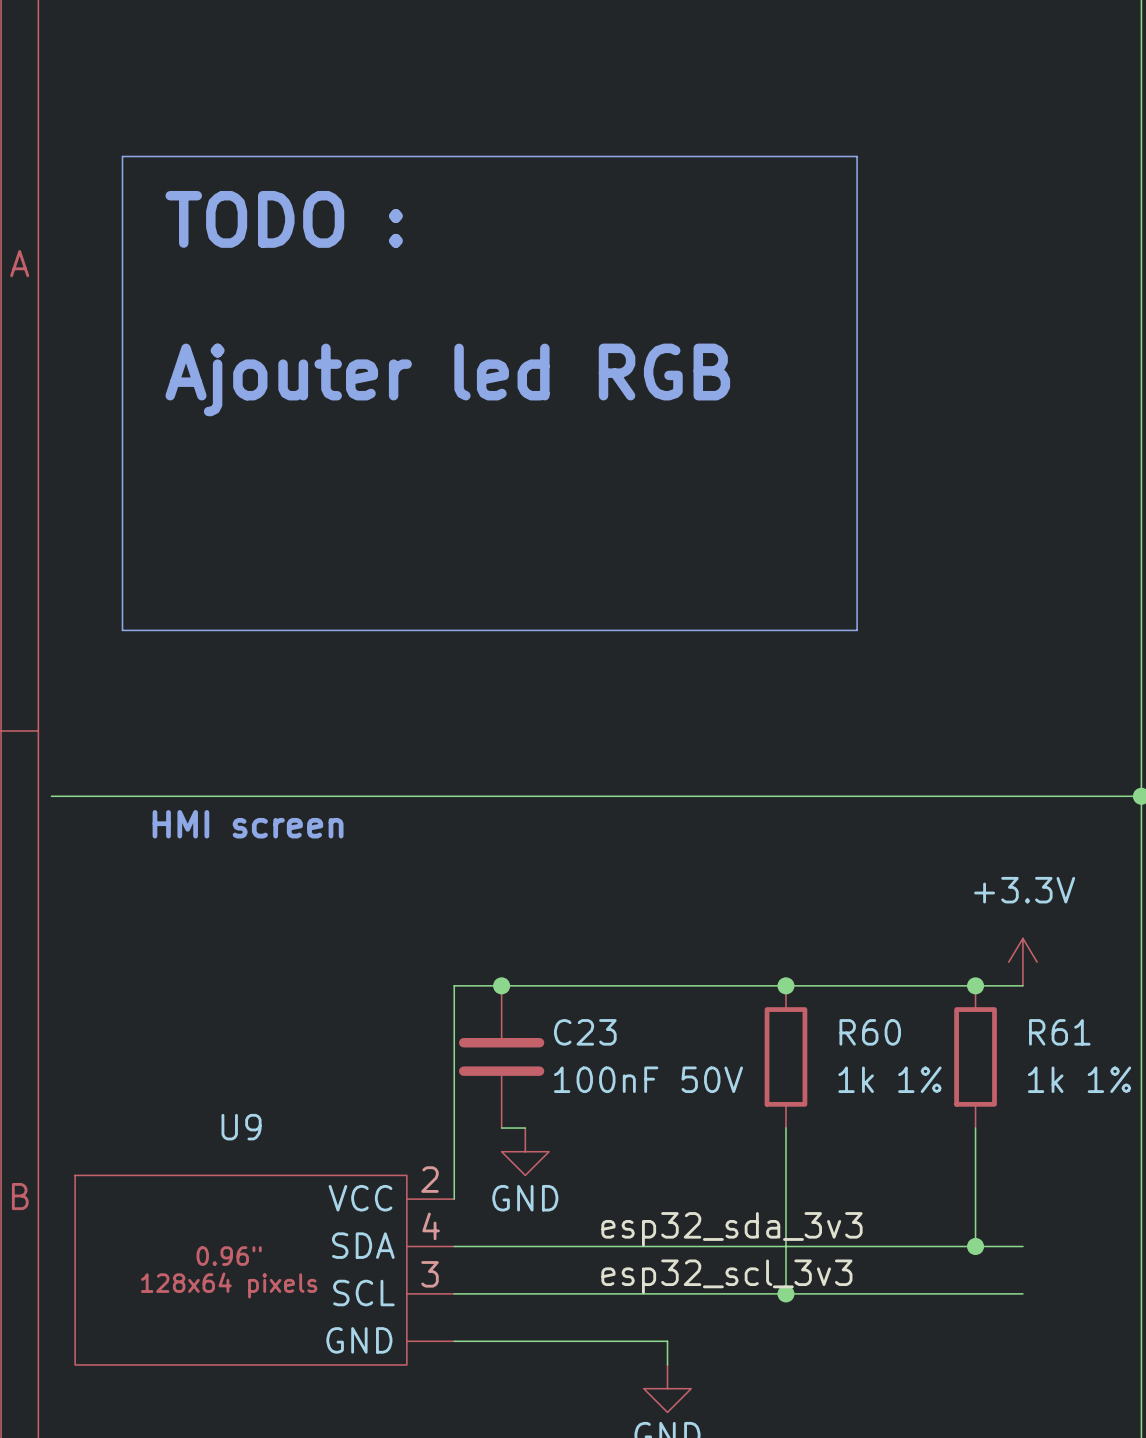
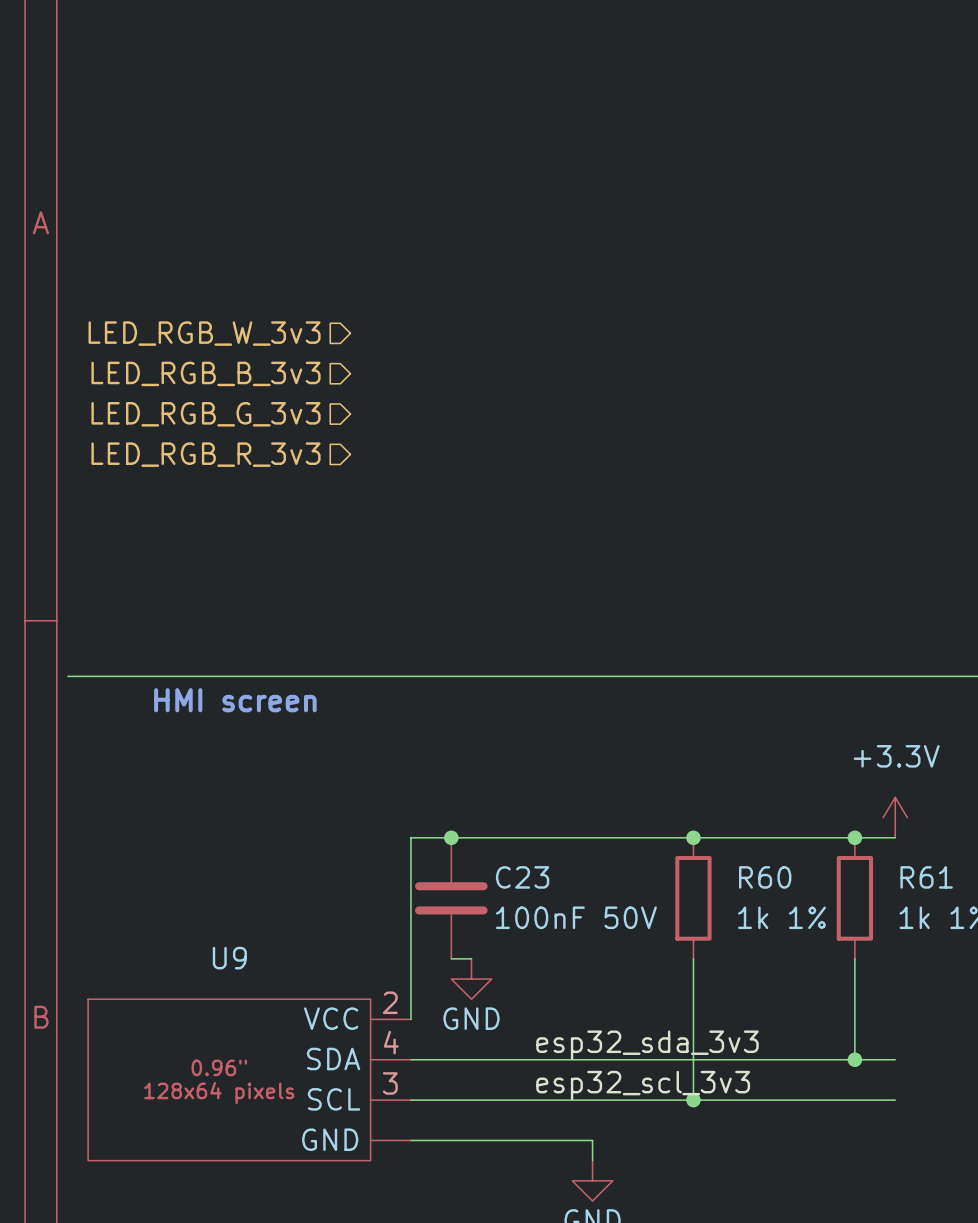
line: (122, 156) (857, 156) (857, 630) (122, 630) (122, 156) -> none
text: TODO : (284, 219) -> none
text: Ajouter led RGB (447, 379) -> none
hierarchical label: none -> LED_RGB_W_3v3 (204, 333)
hierarchical label: none -> LED_RGB_B_3v3 (205, 373)
hierarchical label: none -> LED_RGB_G_3v3 (205, 414)
hierarchical label: none -> LED_RGB_R_3v3 (205, 454)

